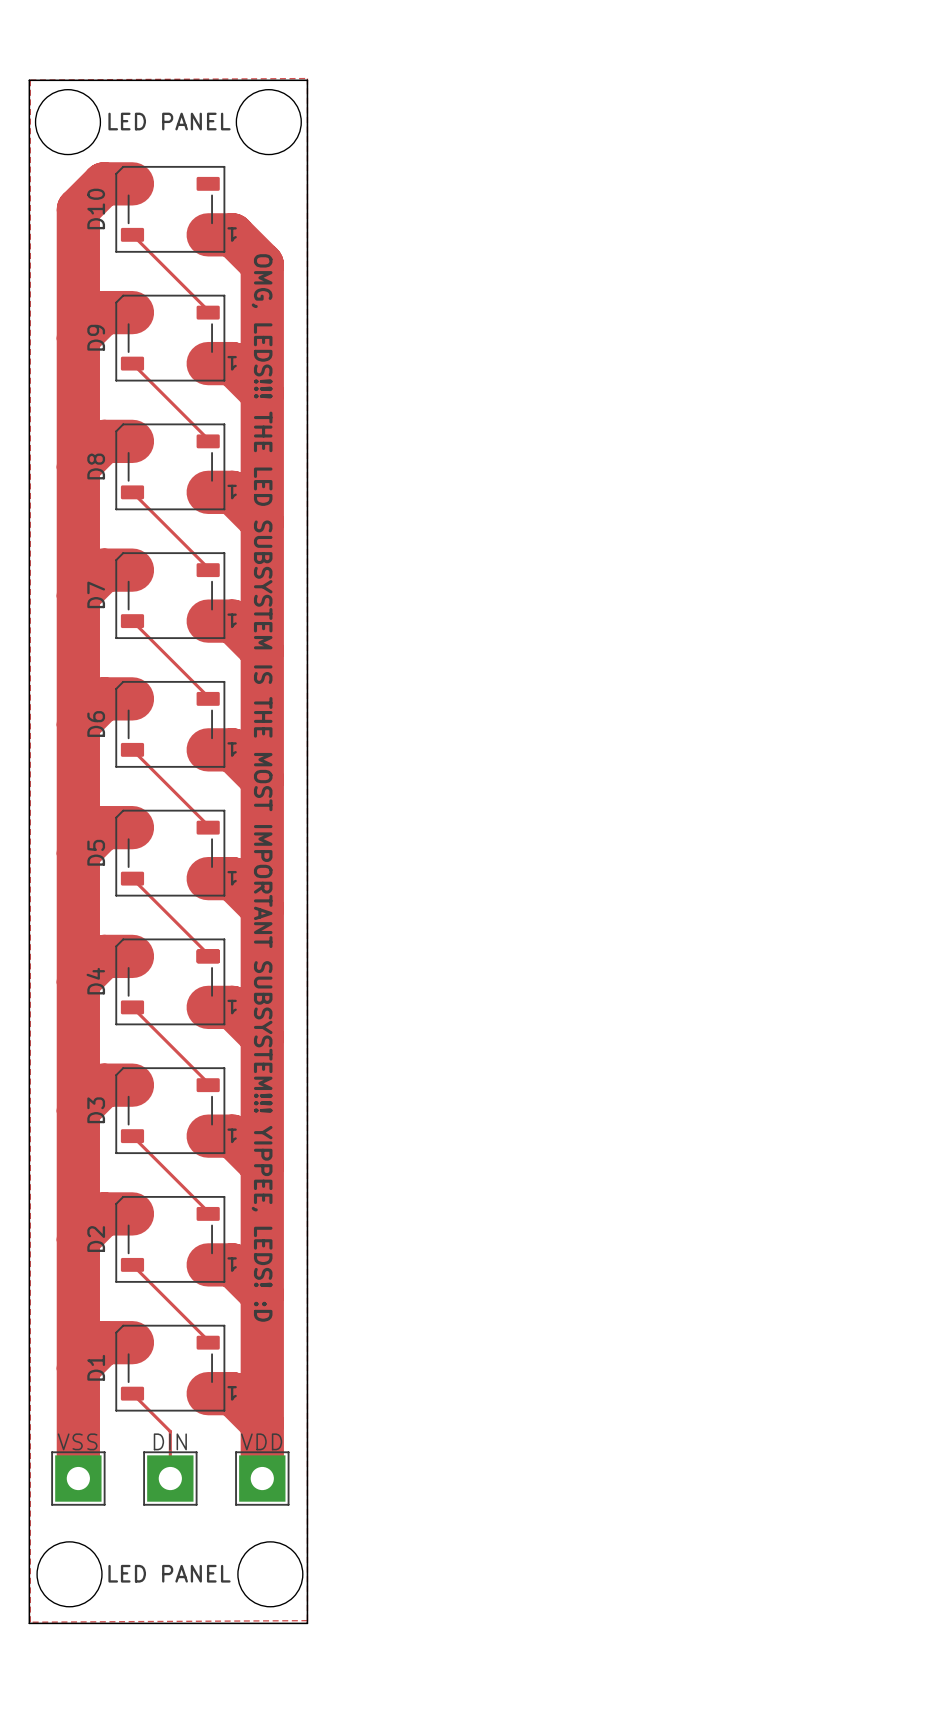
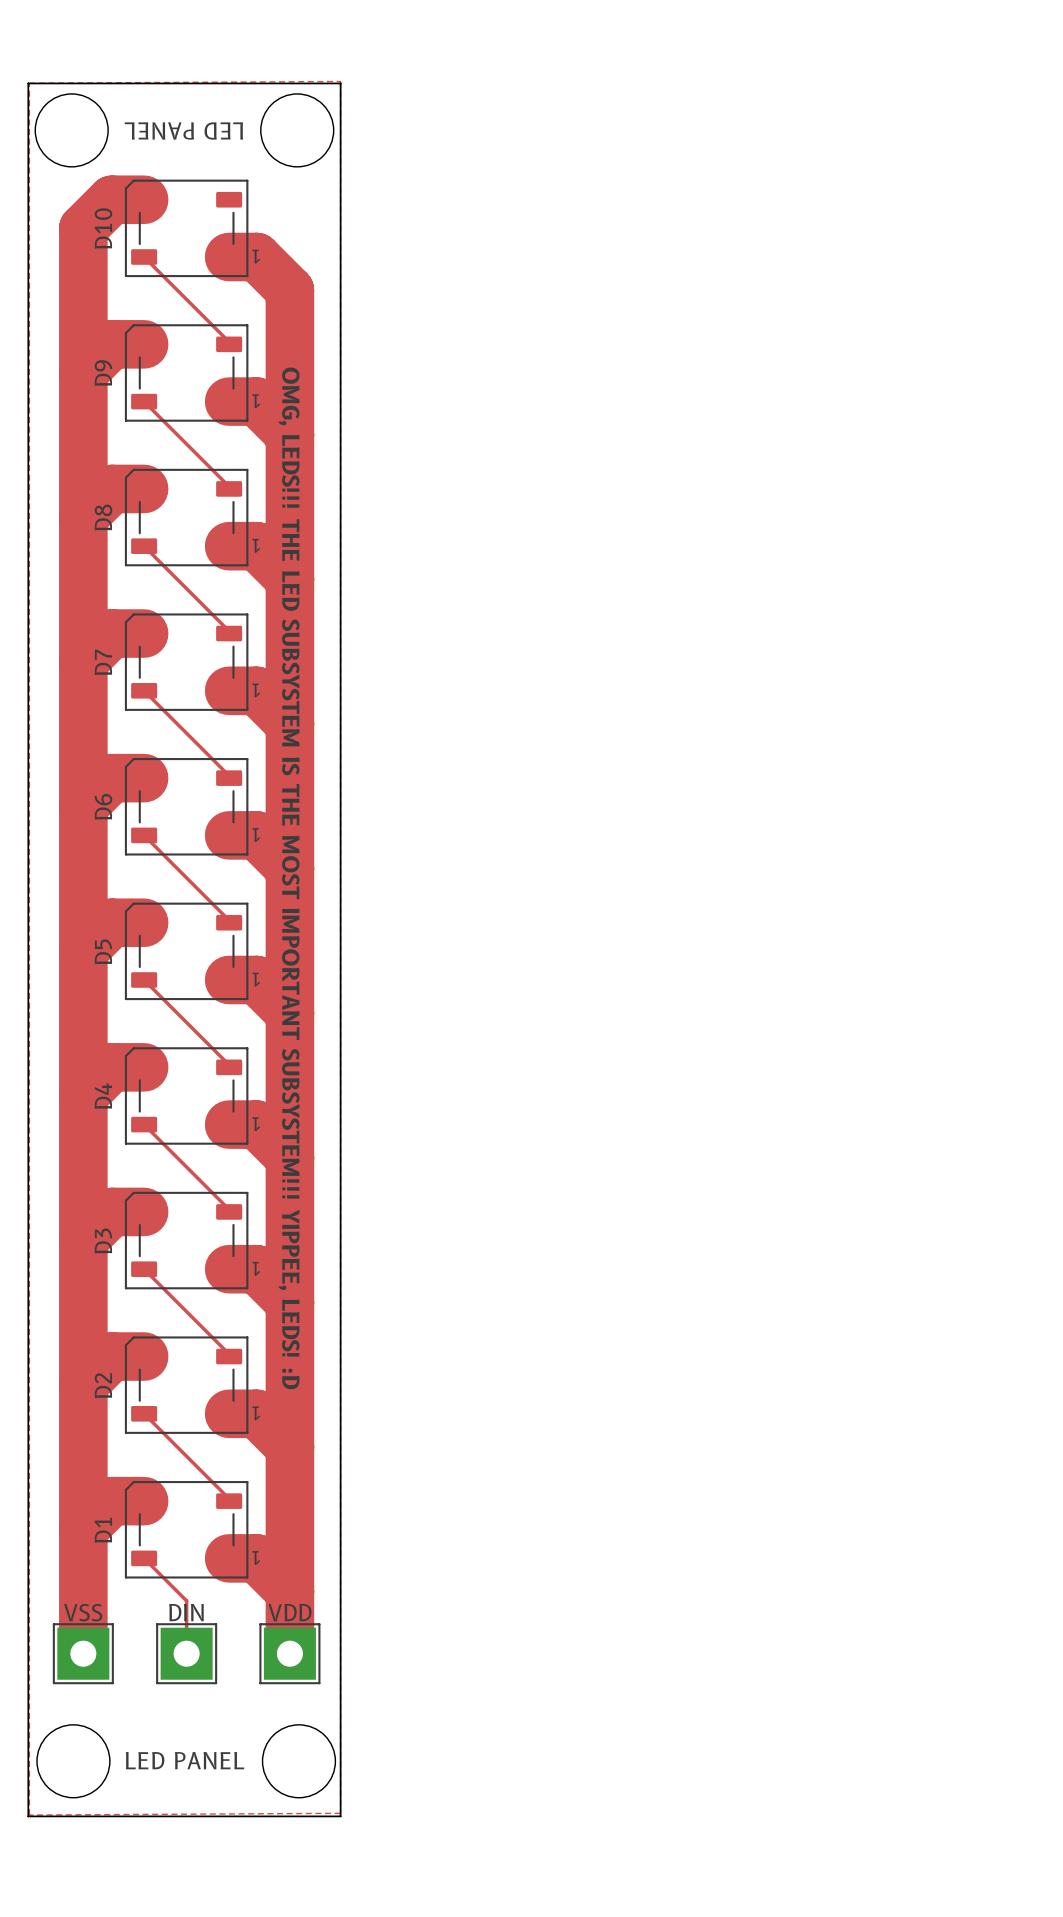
text rotation: 0° (169, 121) -> 180° (183, 131)
part: (208, 956) -> none

